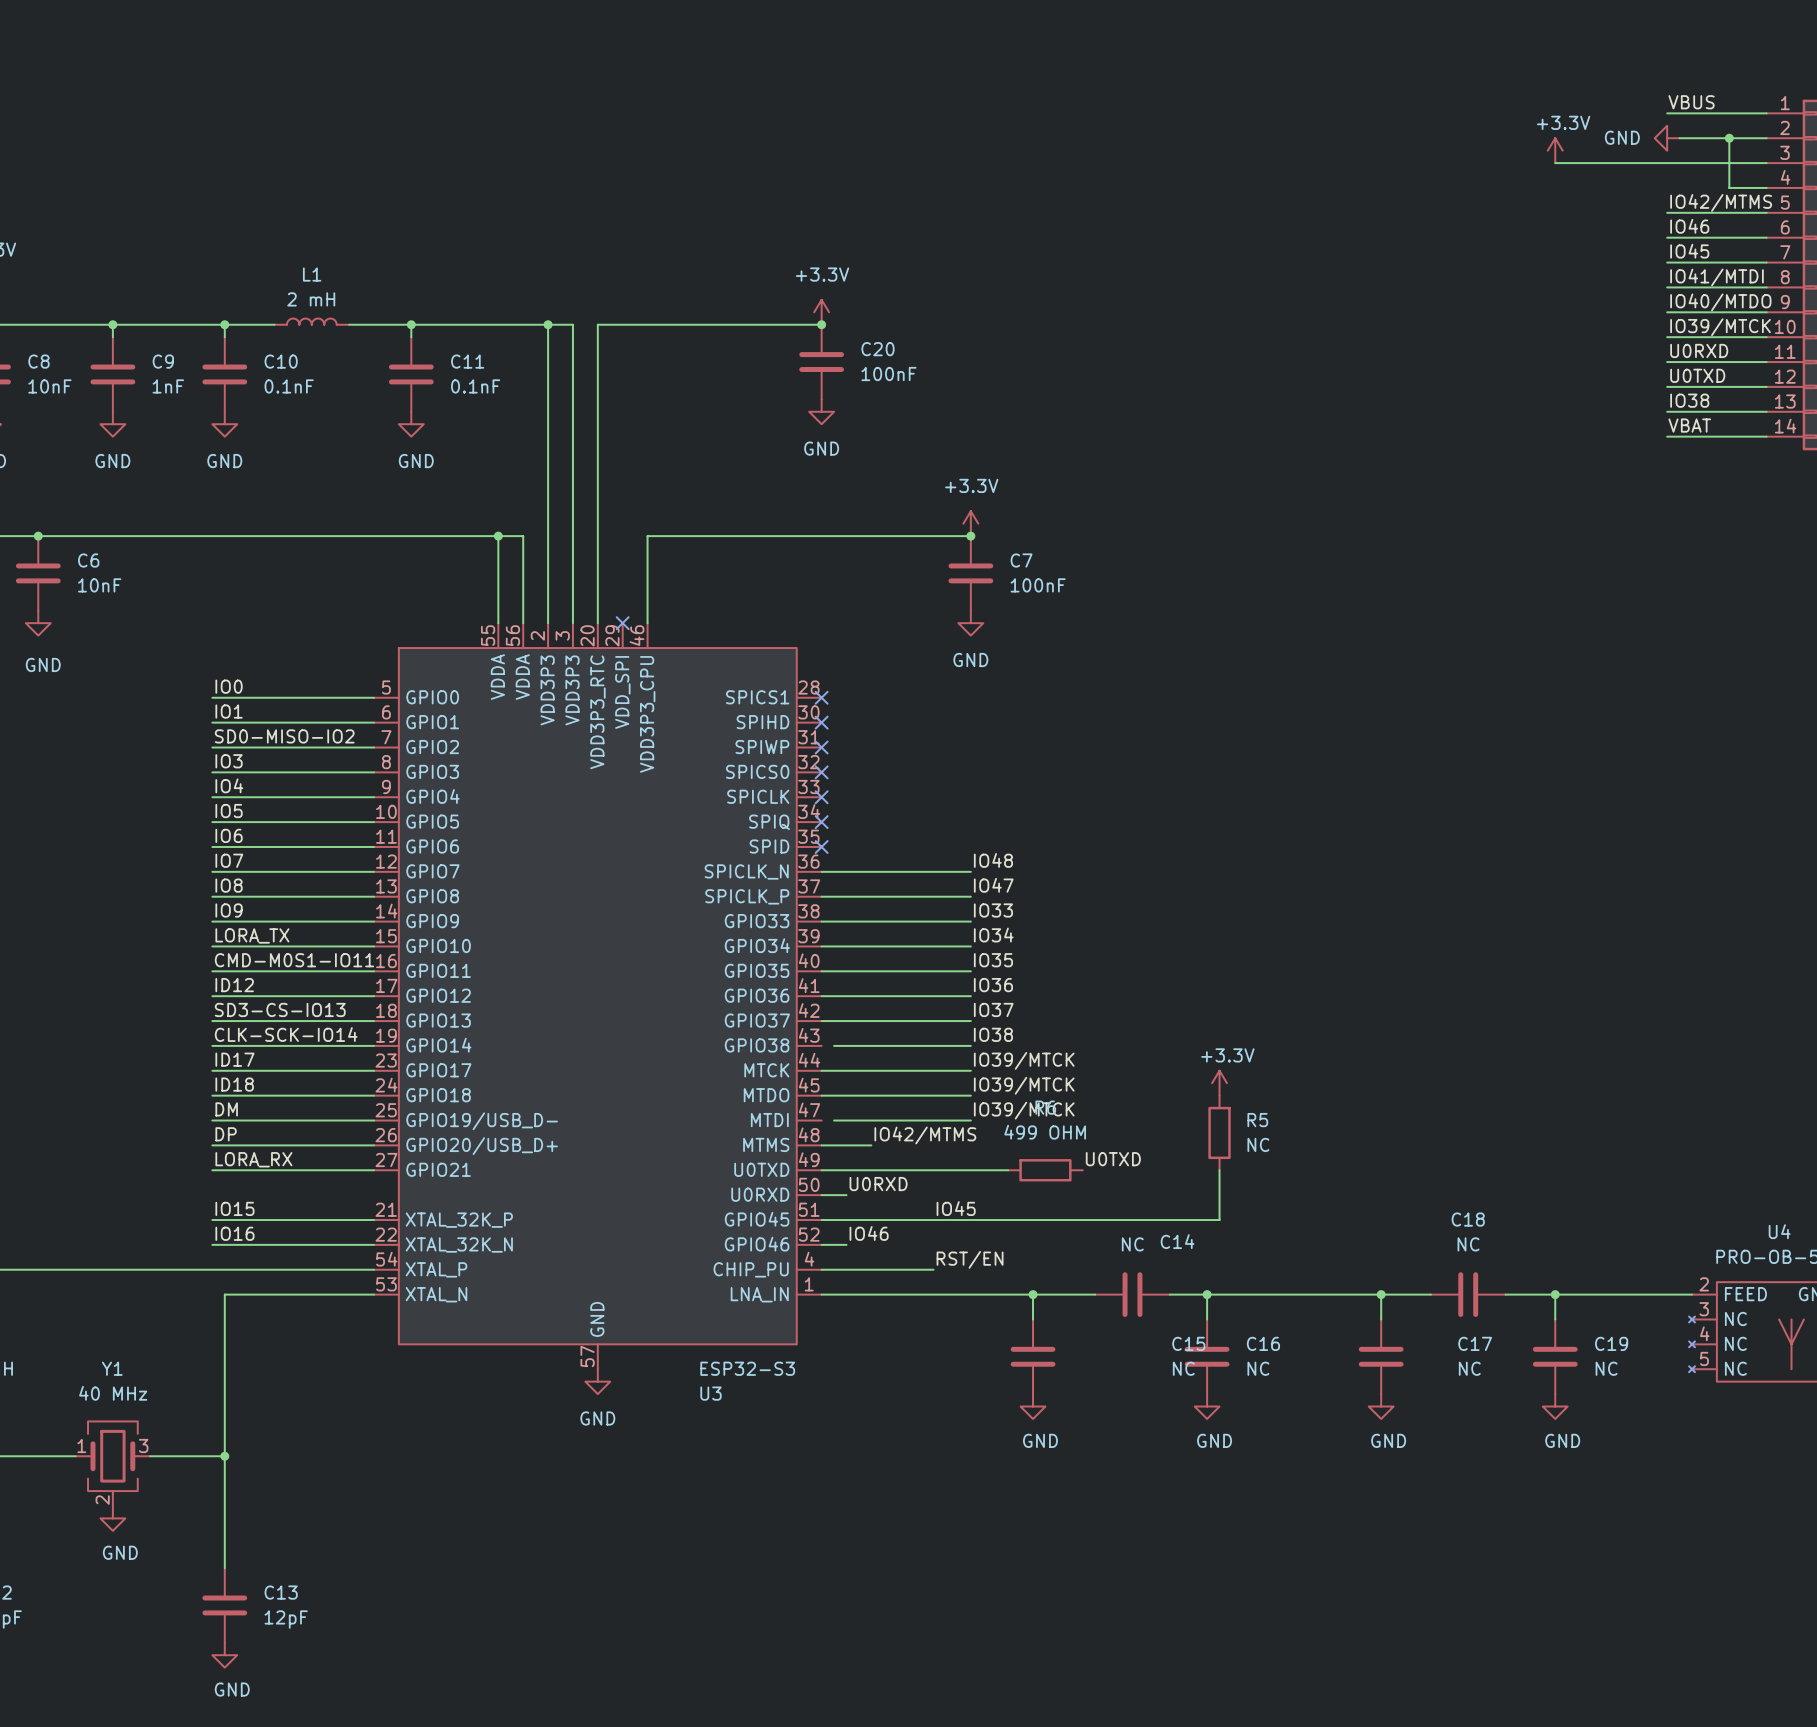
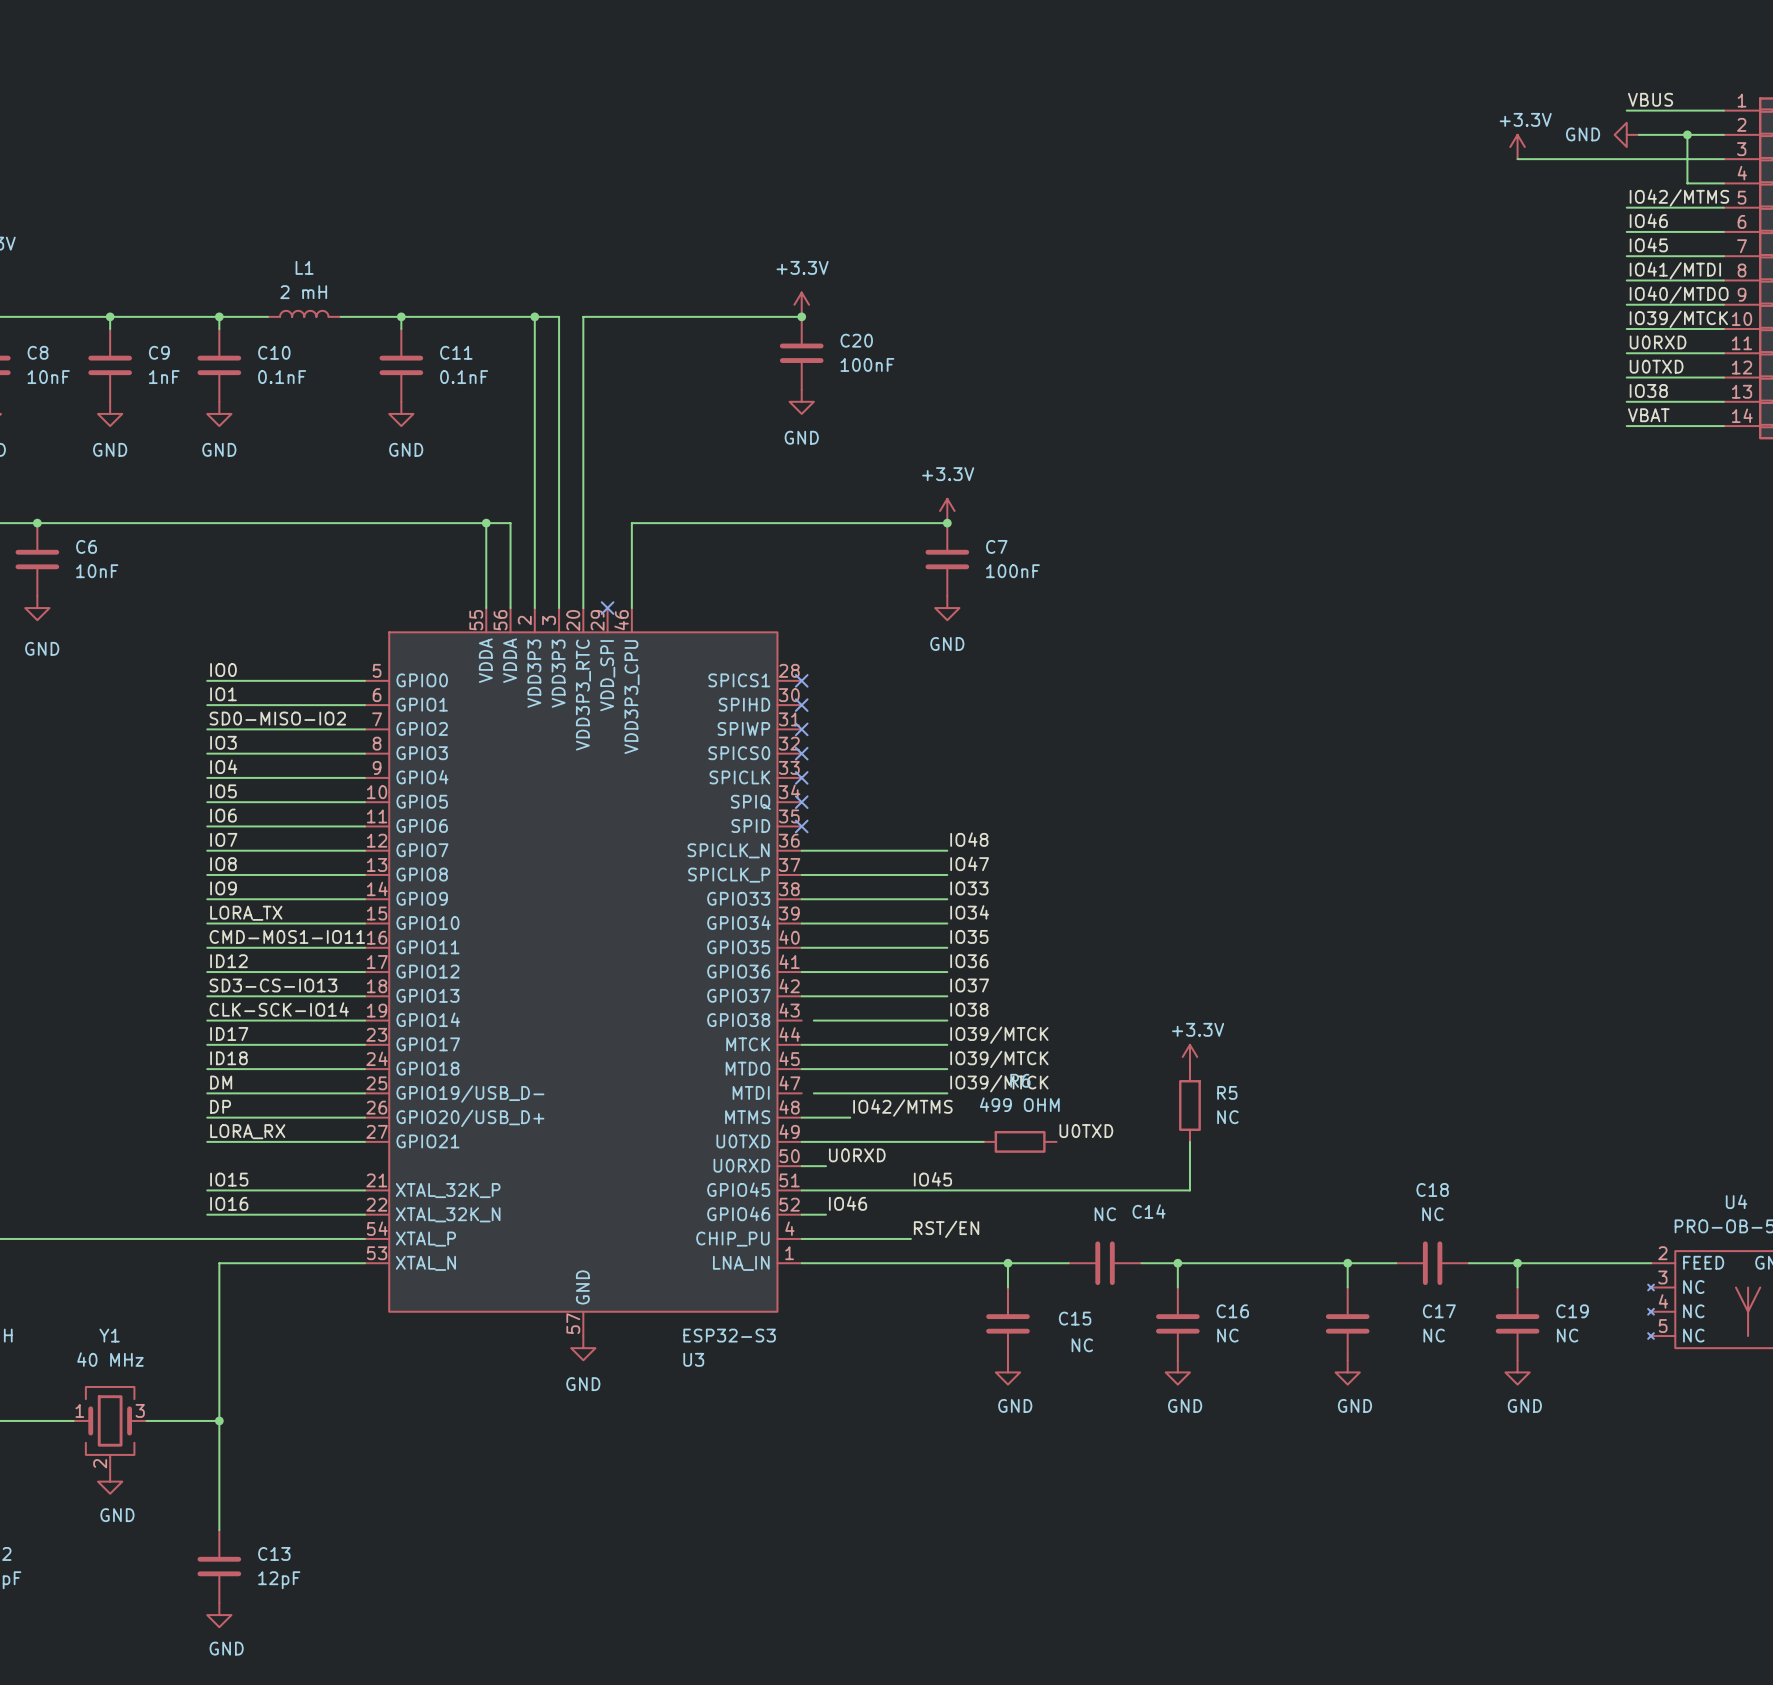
C15 name position: C15 (1188, 1343) -> C15 (1075, 1318)
C15 value position: NC (1183, 1368) -> NC (1082, 1345)

